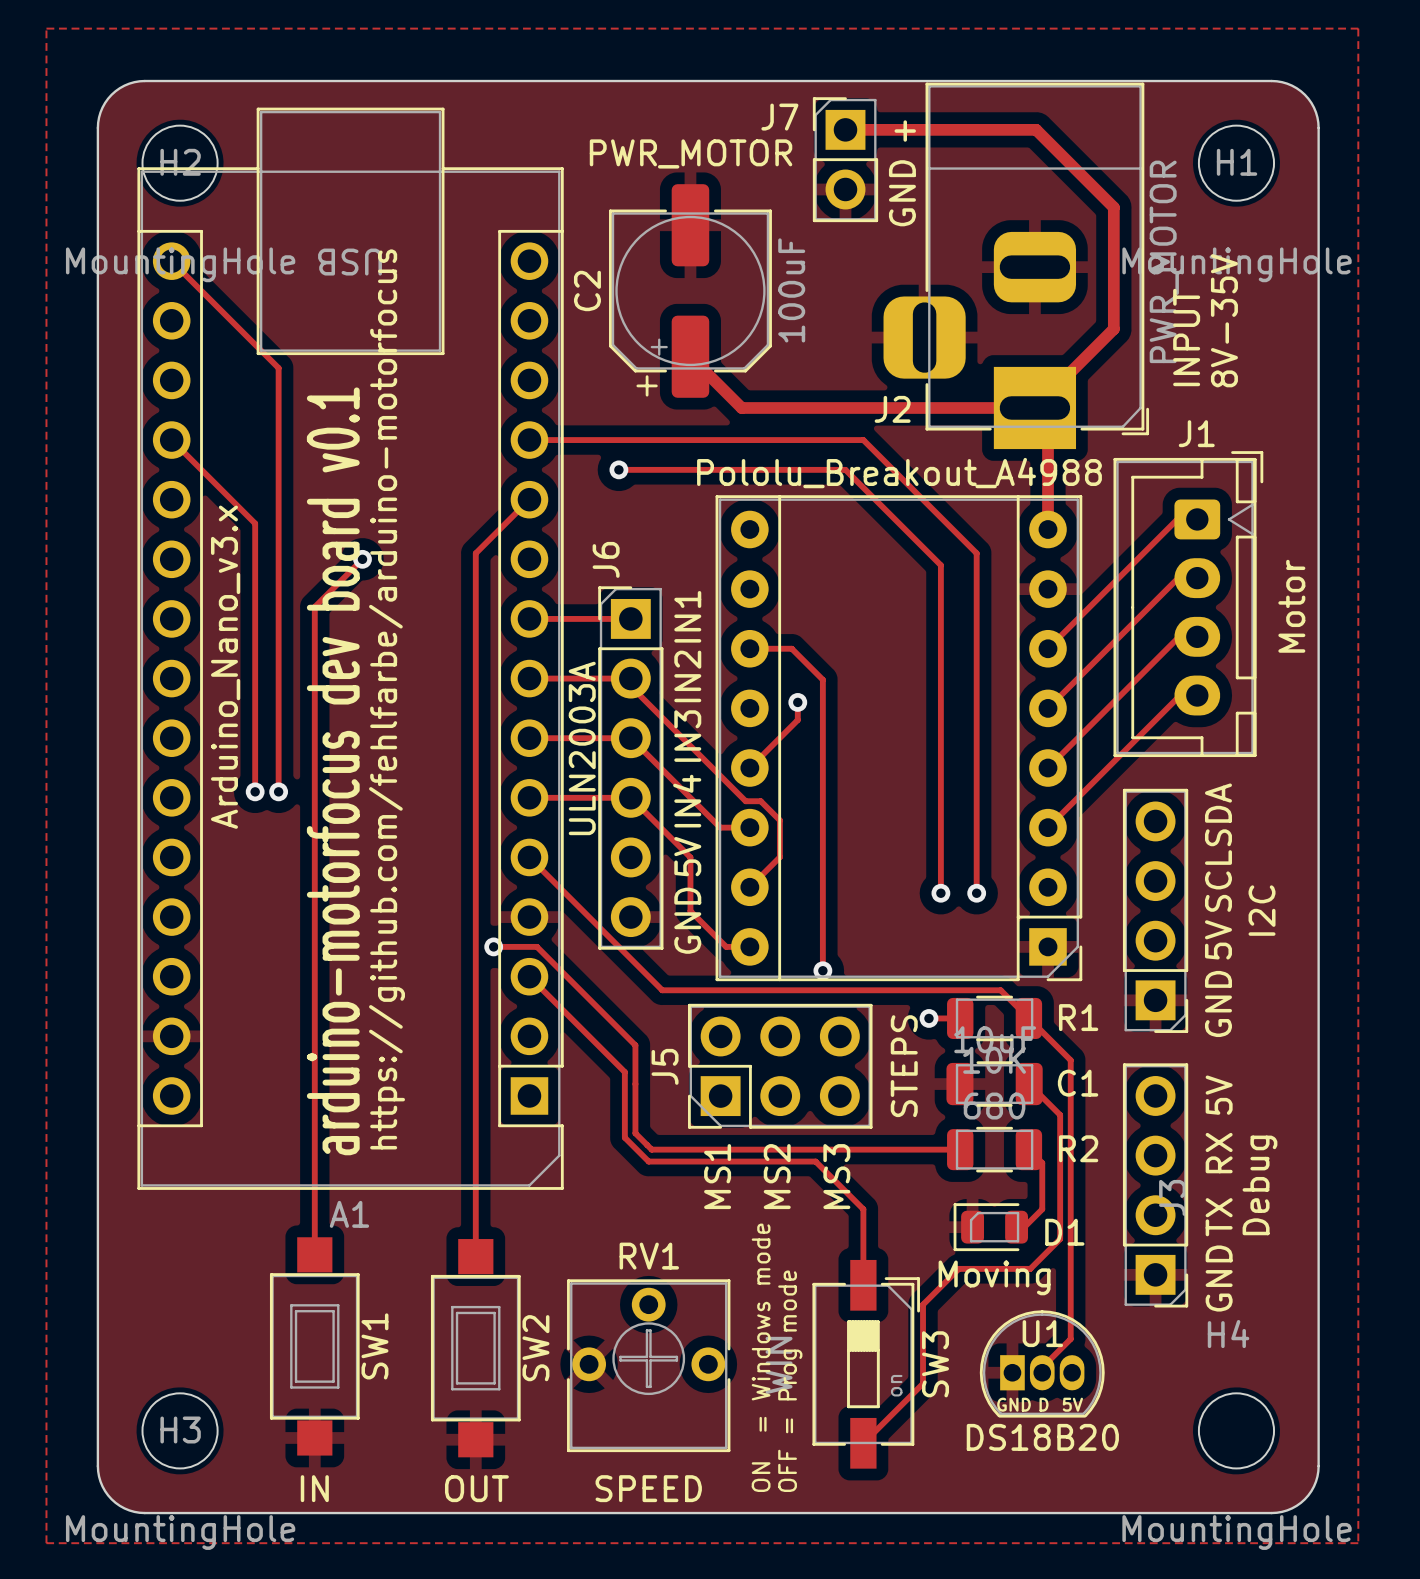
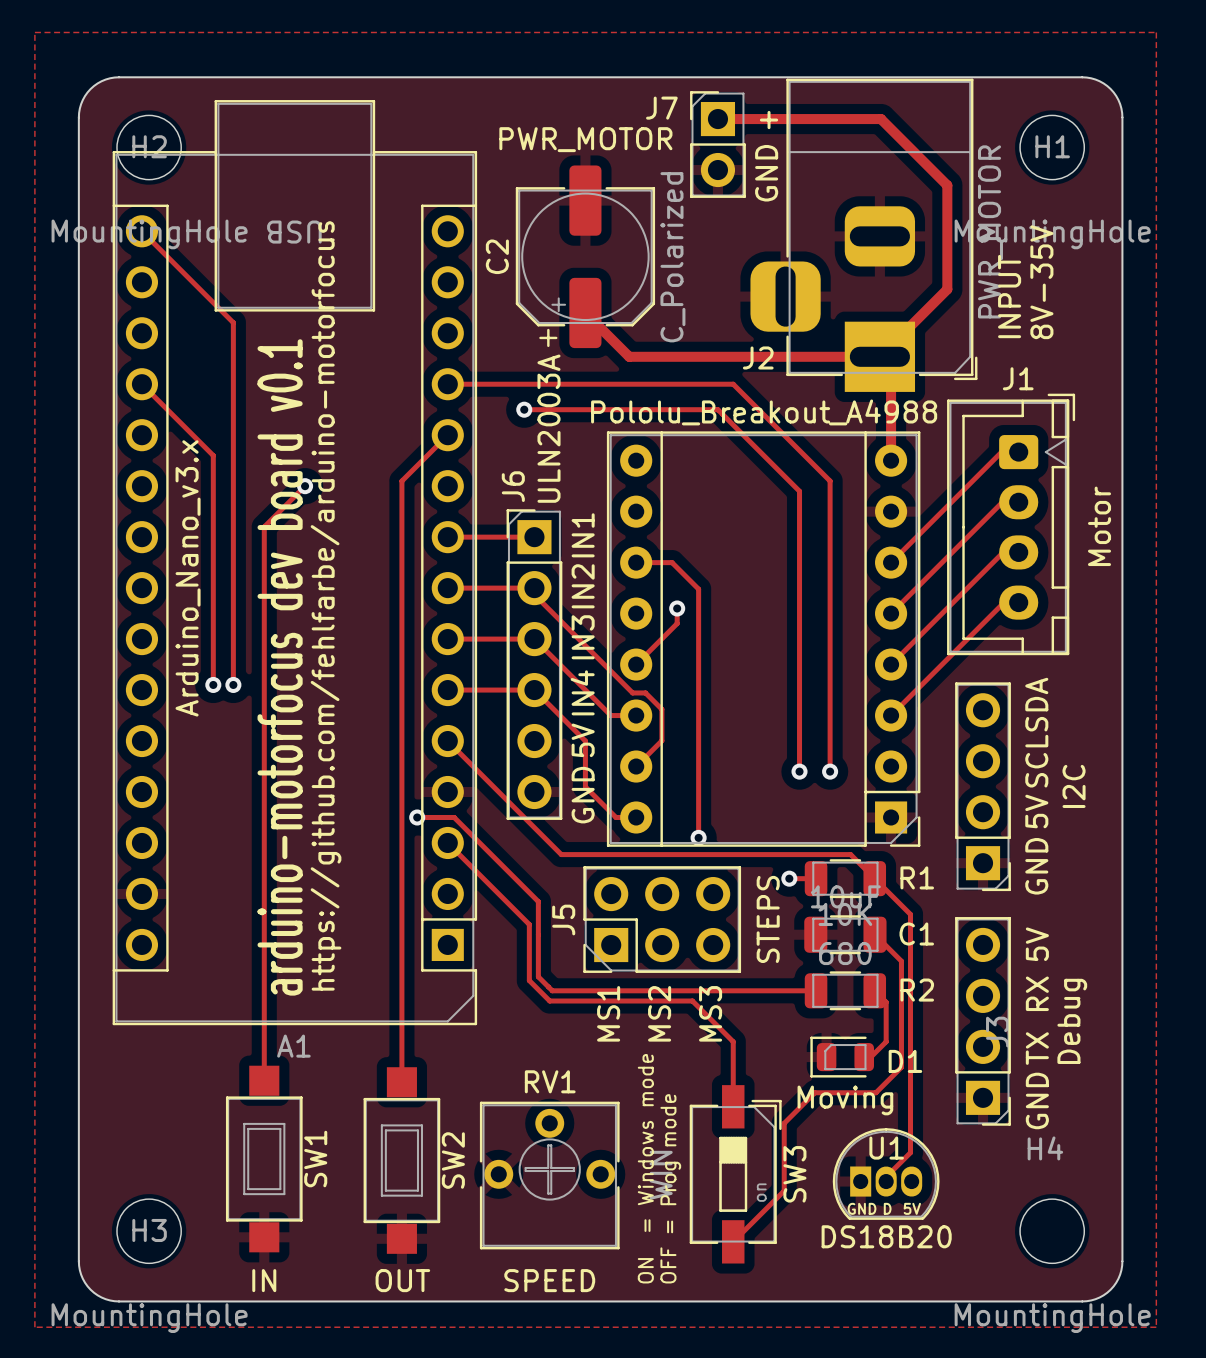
C2 value: 100uF (791, 290) -> C_Polarized (672, 257)
J6 value position: ULN2003A (582, 748) -> ULN2003A (548, 428)

